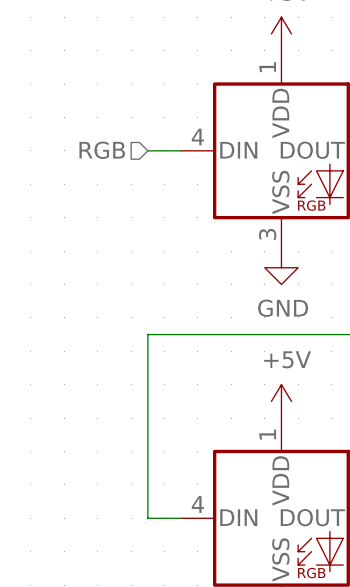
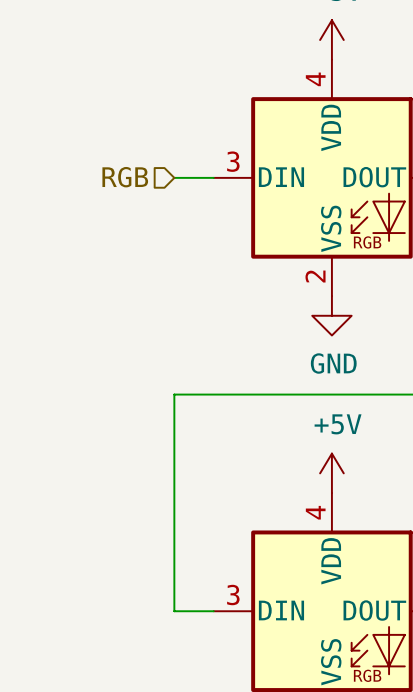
part pin number: 1 (267, 67) -> 4 (315, 79)
part pin number: 4 (197, 137) -> 3 (233, 161)
part pin number: 3 (267, 234) -> 2 (315, 276)
part pin number: 1 (267, 434) -> 4 (315, 512)
part pin number: 4 (197, 504) -> 3 (233, 595)

